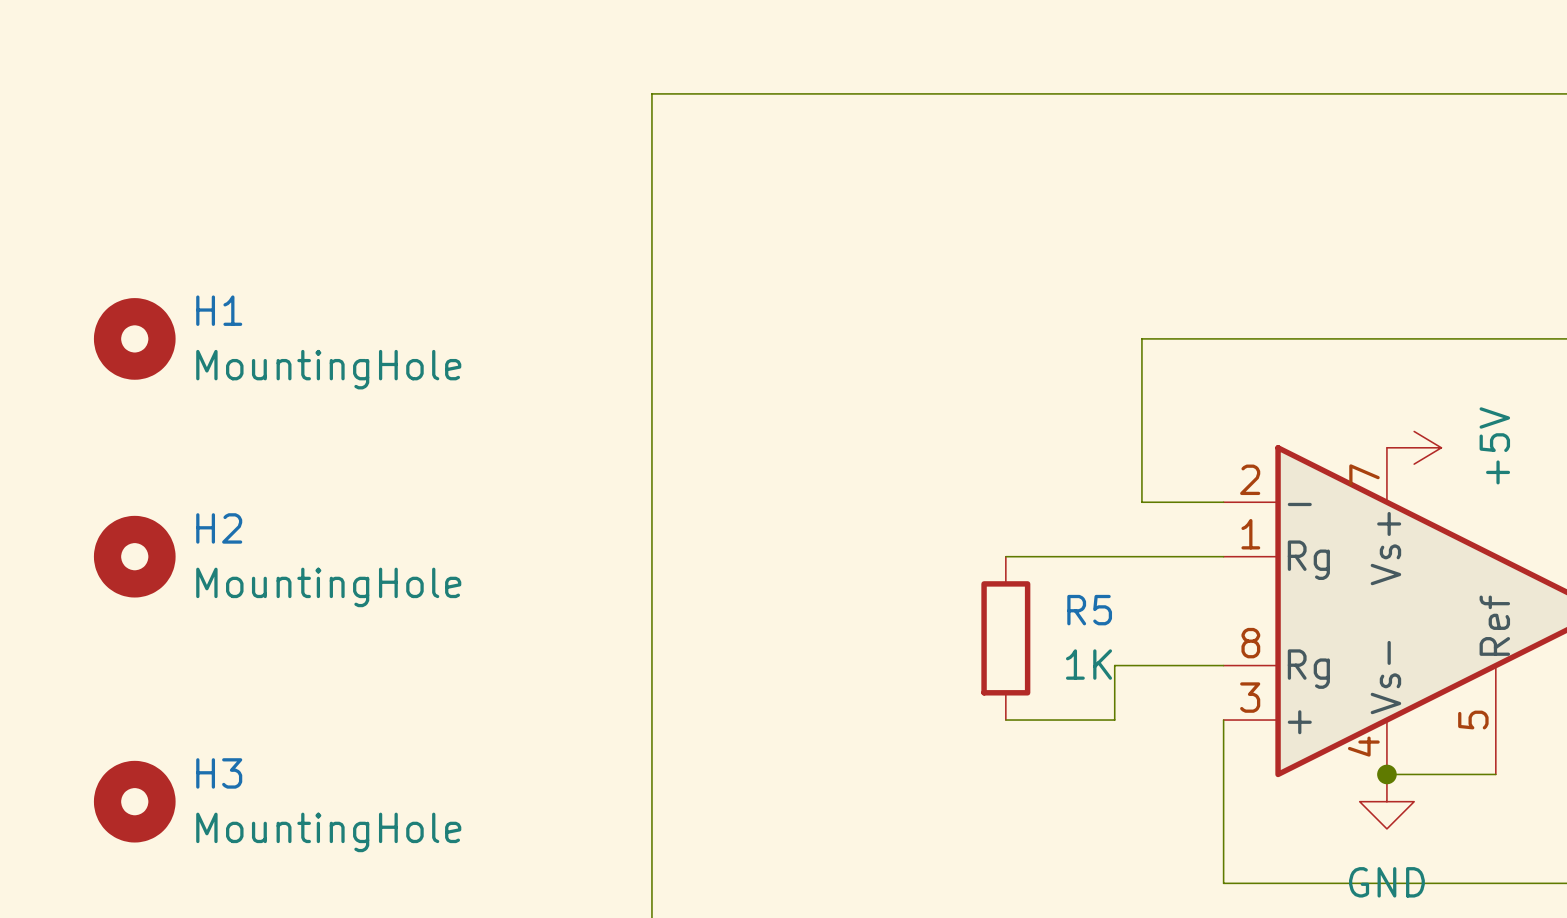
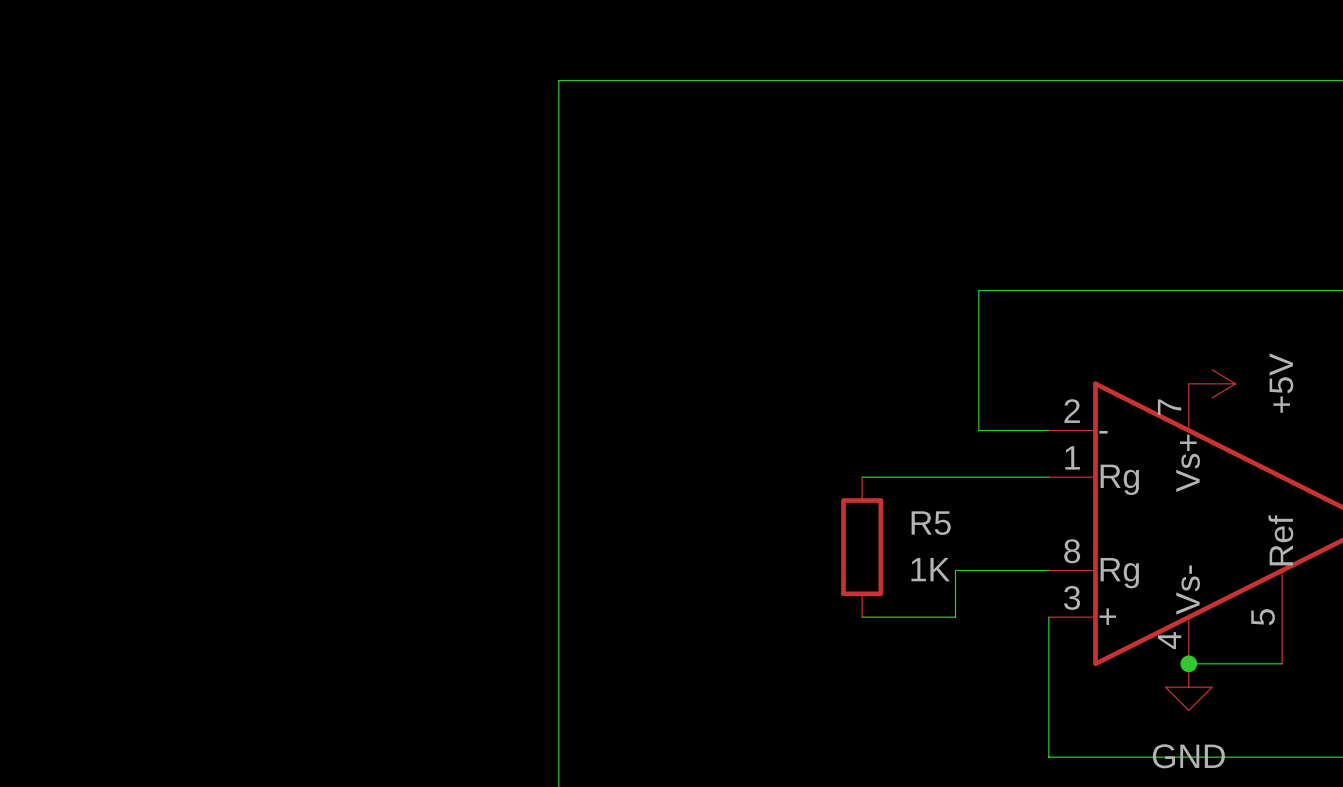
H1: MountingHole (134, 338) -> none
H2: MountingHole (134, 556) -> none
H3: MountingHole (134, 801) -> none

